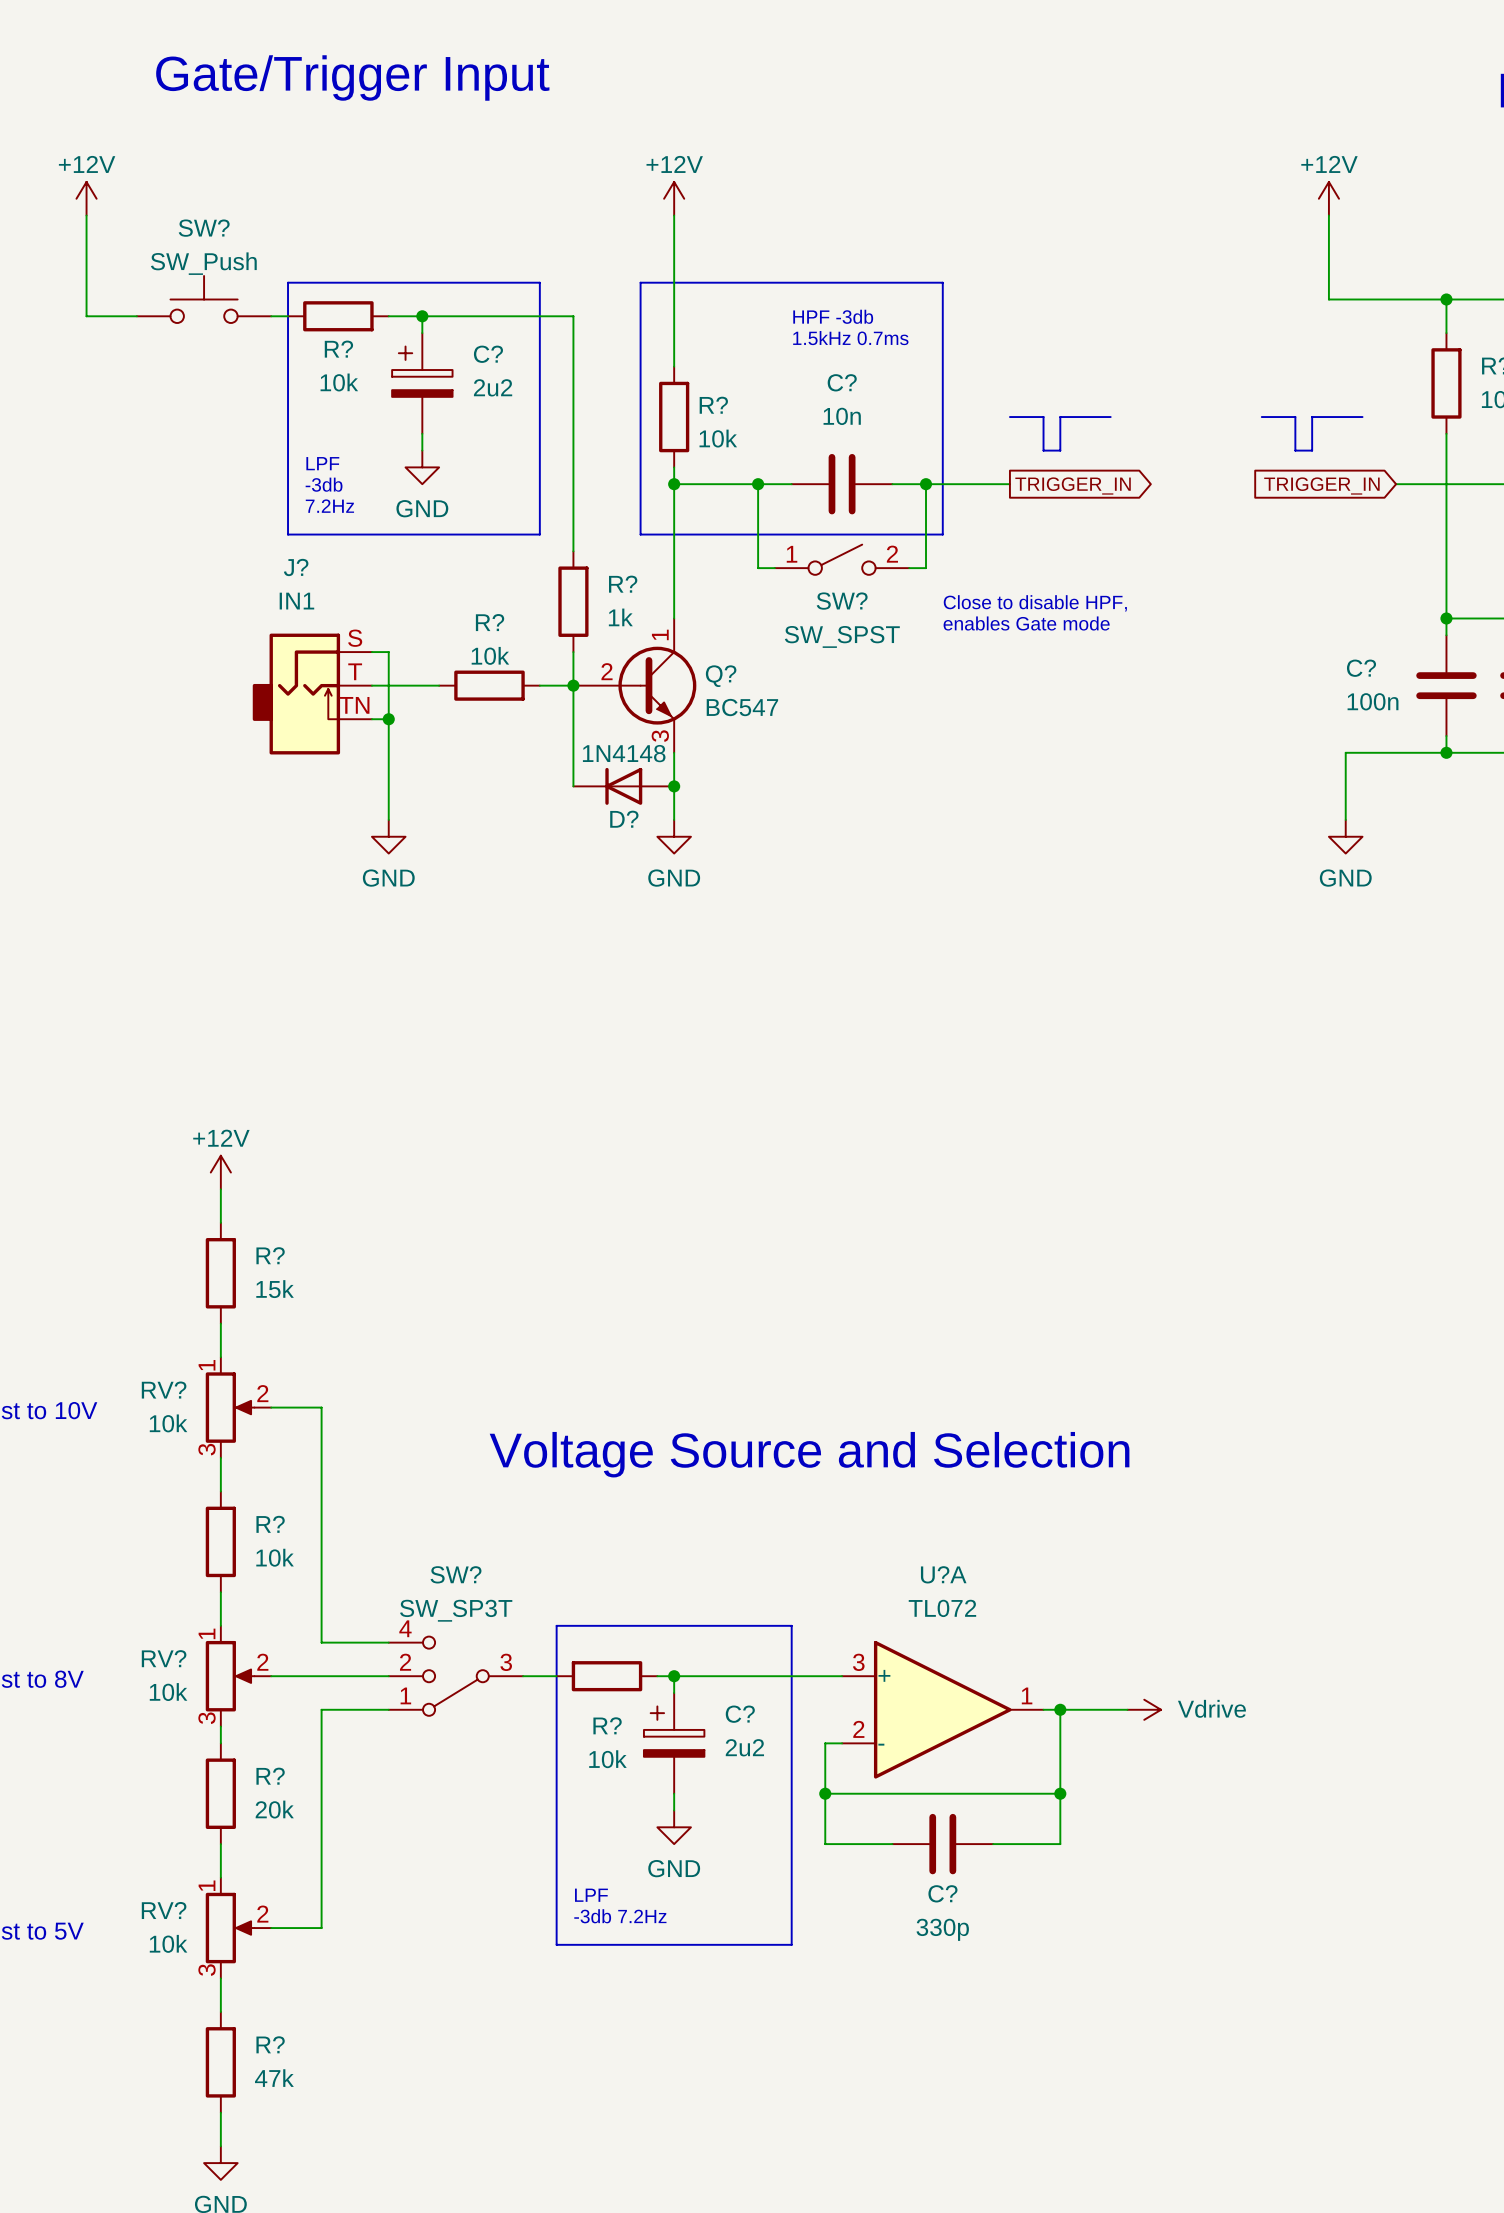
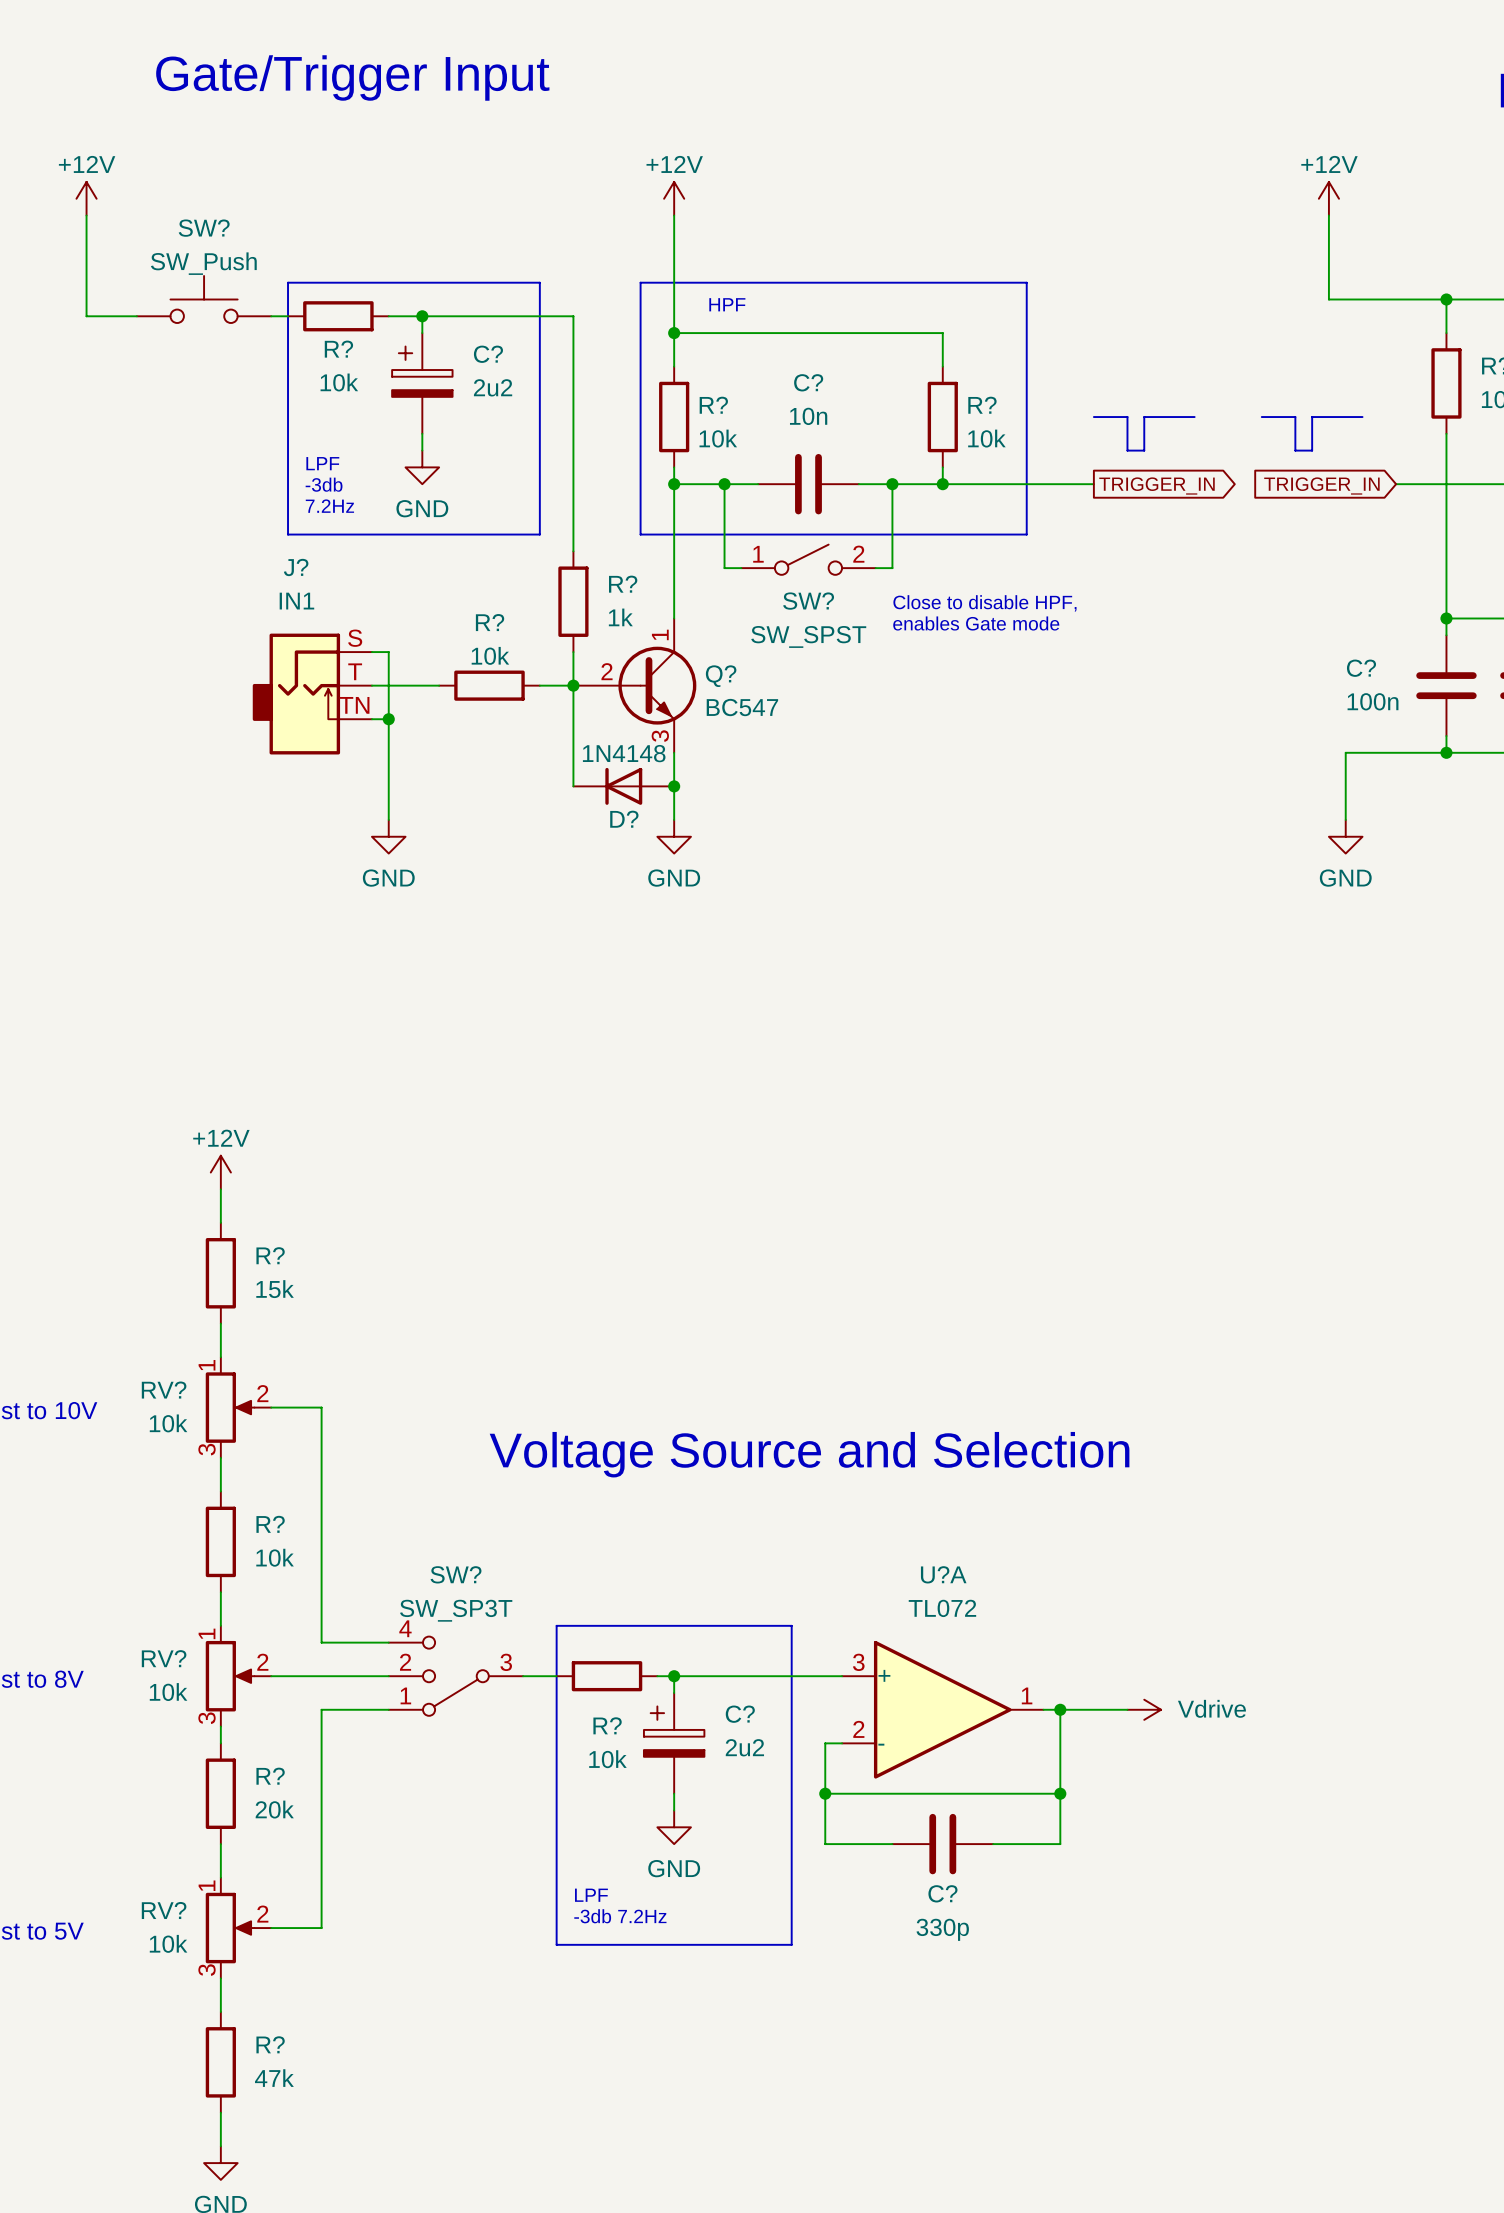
line: (942, 282) (942, 534) -> (942, 282) (1026, 282) (1026, 534) (942, 534)
text: none -> HPF (727, 304)
text: HPF -3db (833, 316) -> none
wire: none -> (674, 333) (942, 333) (942, 366)
junction: none -> (674, 333)
text: 1.5kHz 0.7ms (850, 338) -> none
R?: none -> 10k (942, 417)
line: (1009, 417) (1043, 417) (1043, 450) (1060, 450) (1060, 417) (1093, 417) -> none
line: none -> (1110, 417) (1127, 417) (1127, 450) (1144, 450) (1144, 417) (1194, 417)
wire: none -> (724, 484) (724, 568) (741, 568)
junction position: (758, 484) -> (724, 484)
wire: (791, 484) (758, 484) (758, 568) (774, 568) -> none
C? position: (842, 484) -> (808, 484)
wire: none -> (858, 484) (892, 484) (892, 568) (875, 568)
junction: none -> (892, 484)
wire: (926, 484) (926, 568) (909, 568) -> none
junction: (926, 484) -> none
junction: none -> (942, 484)
wire: none -> (1009, 484) (1093, 484)
global label position: TRIGGER_IN (1073, 485) -> TRIGGER_IN (1157, 485)
SW? position: (842, 559) -> (808, 559)
text position: Close to disable HPF, (1035, 603) -> Close to disable HPF, (984, 603)
text position: enables Gate mode (1026, 623) -> enables Gate mode (976, 623)

